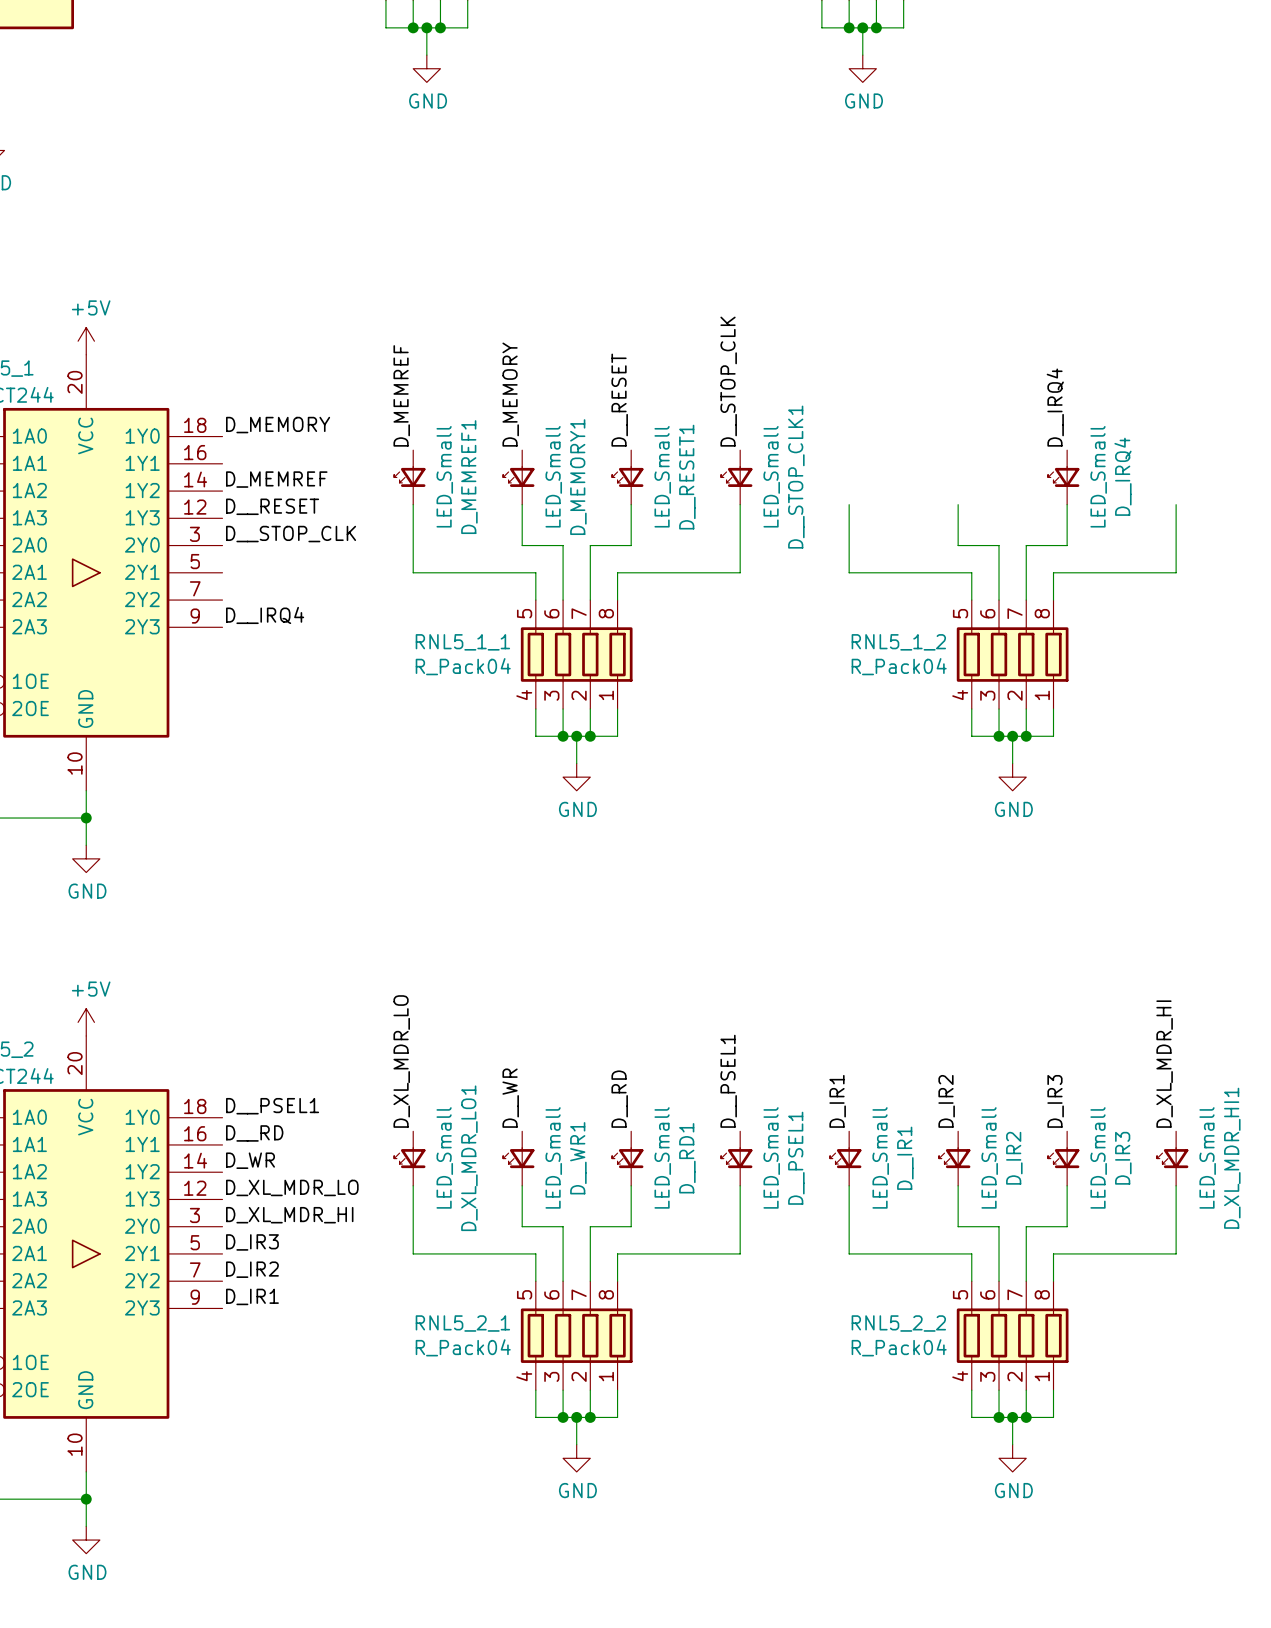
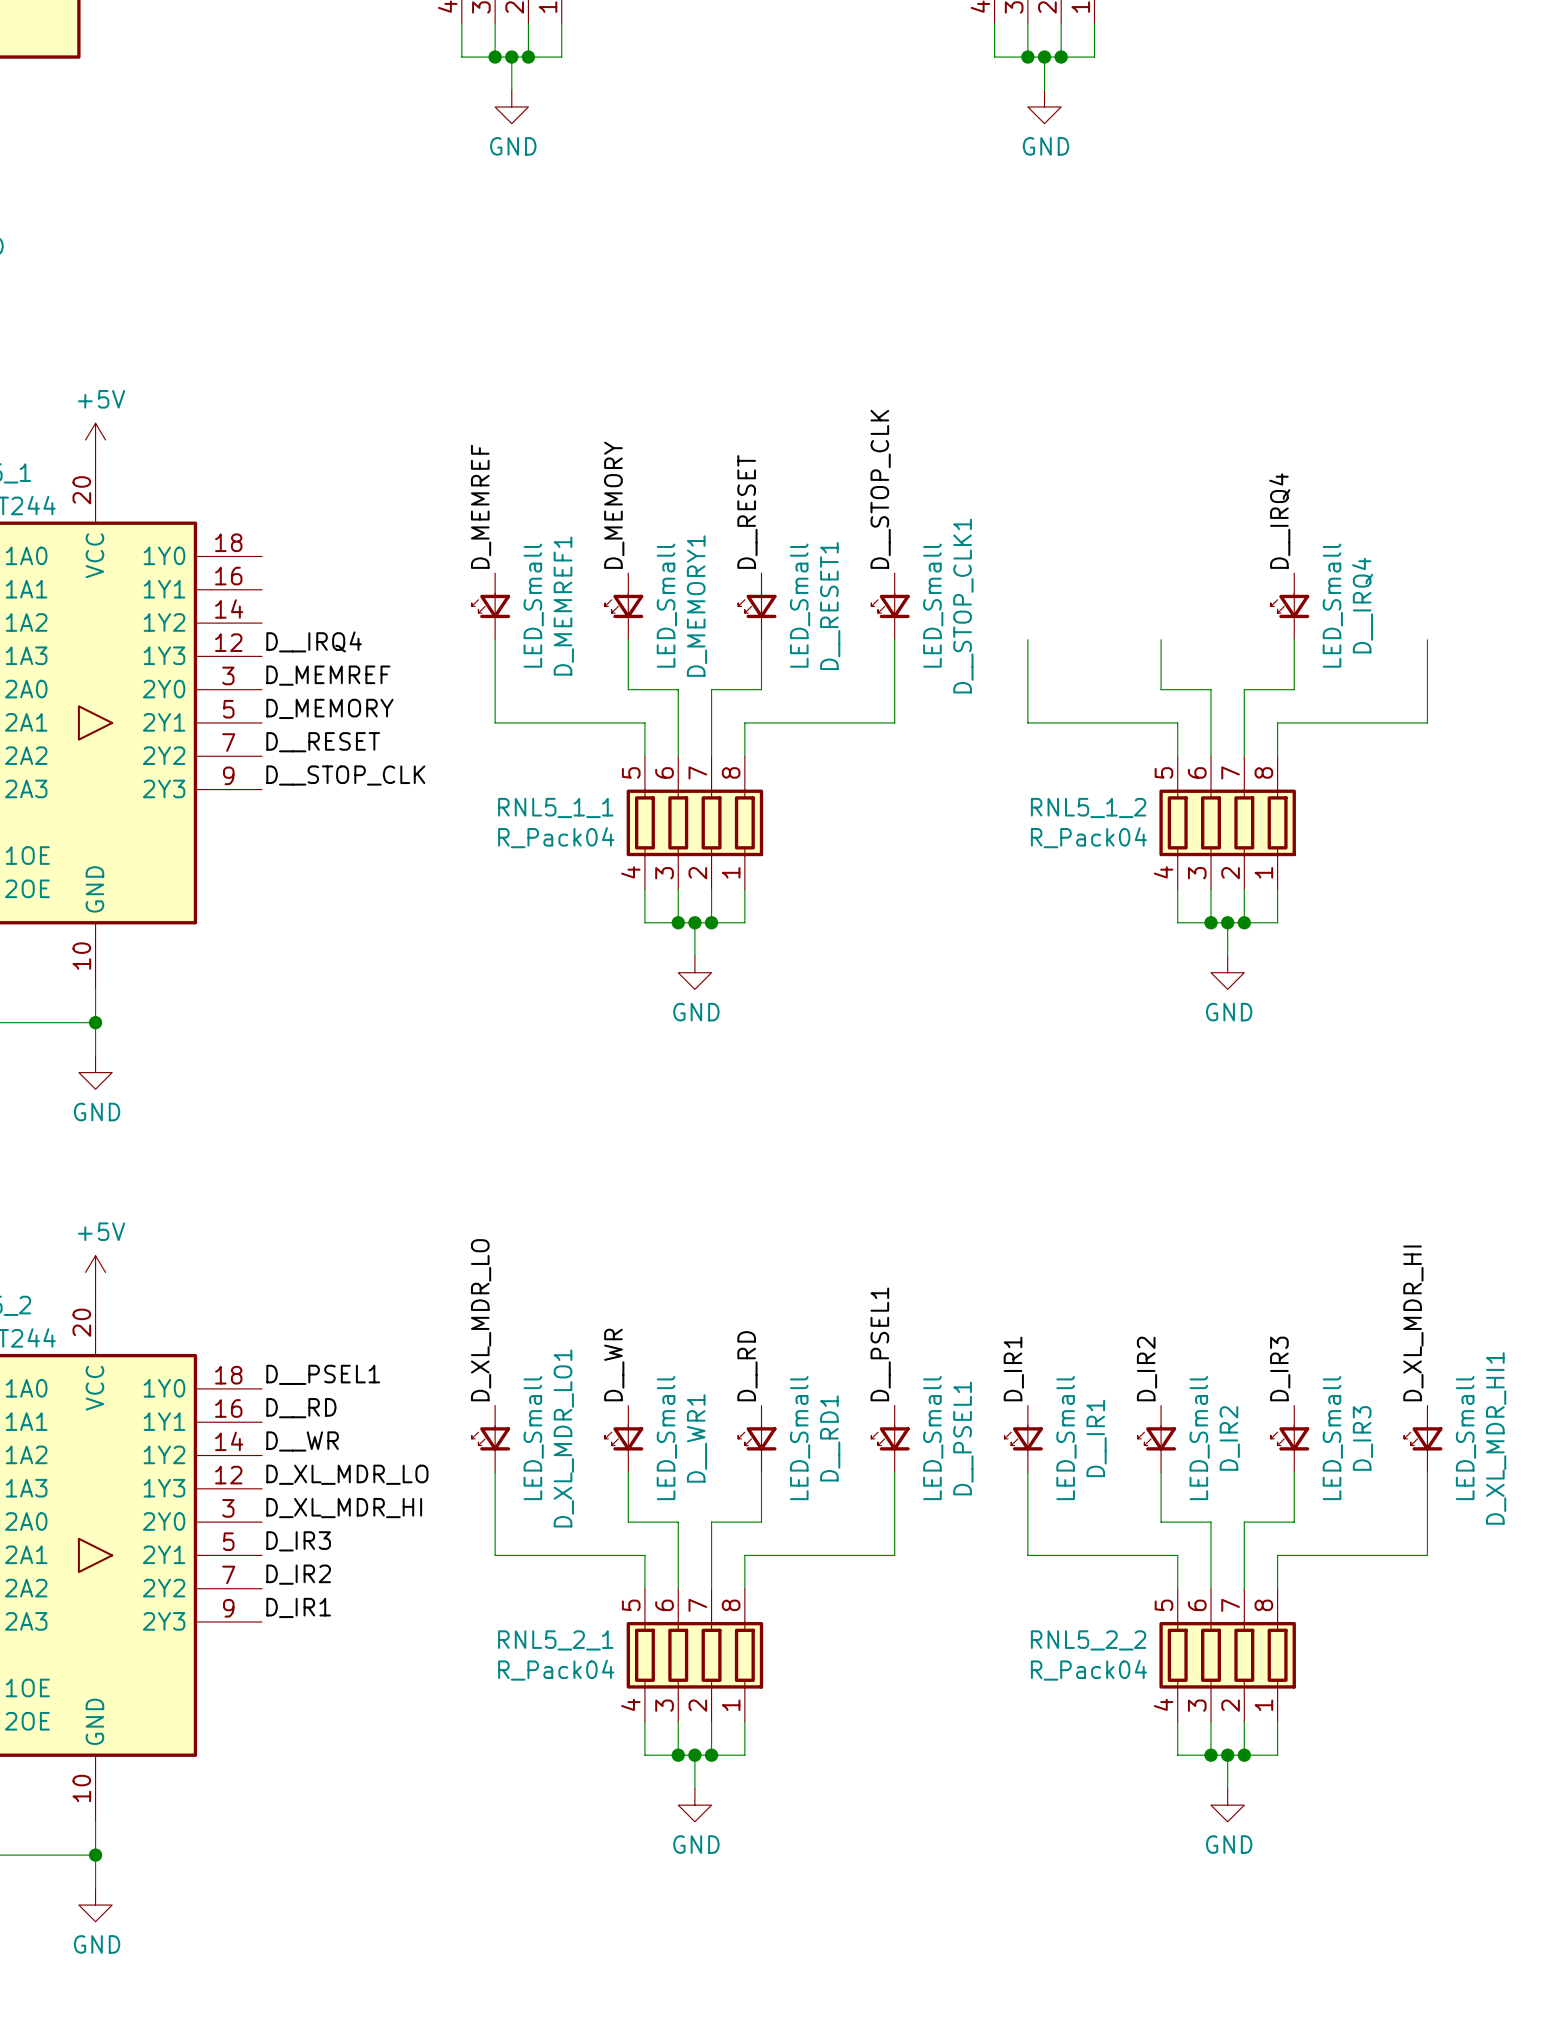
label position: D_MEMORY (278, 425) -> D_MEMORY (329, 708)
label: D_MEMREF (276, 479) -> none
label: D__RESET (272, 506) -> D__IRQ4 (314, 641)
label: D__STOP_CLK (291, 534) -> D_MEMREF (328, 675)
label: none -> D__RESET (323, 742)
label: D__IRQ4 (265, 615) -> D__STOP_CLK (345, 775)
label: D_WR (250, 1160) -> D__WR (302, 1441)

